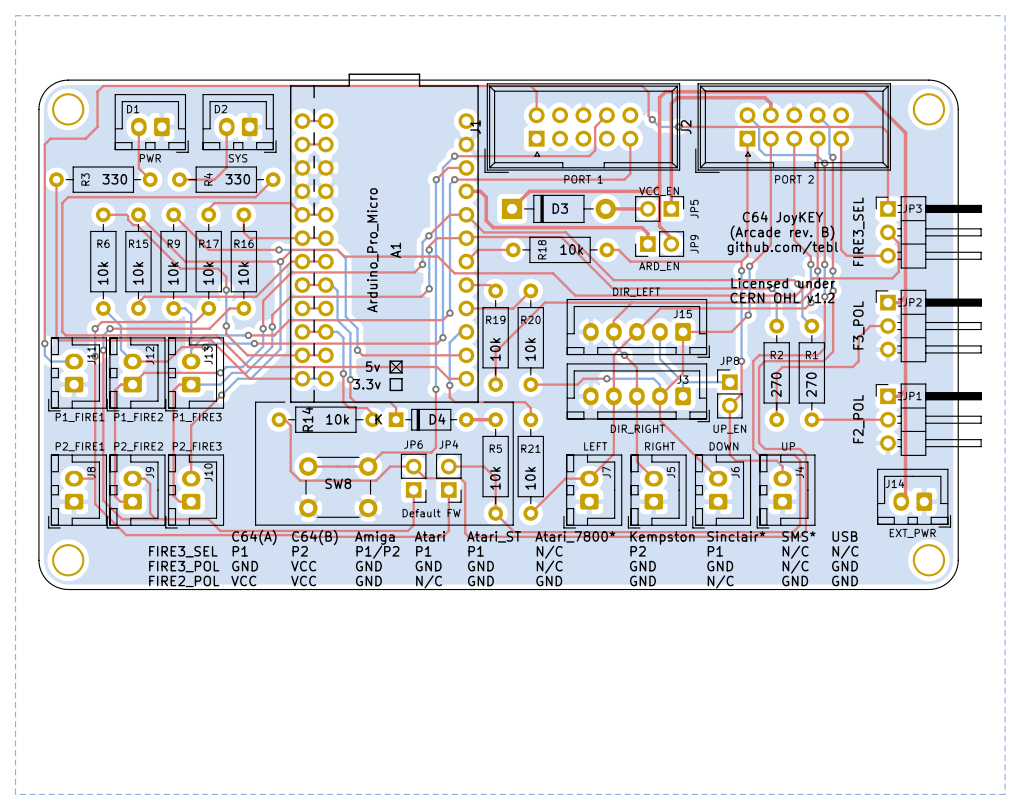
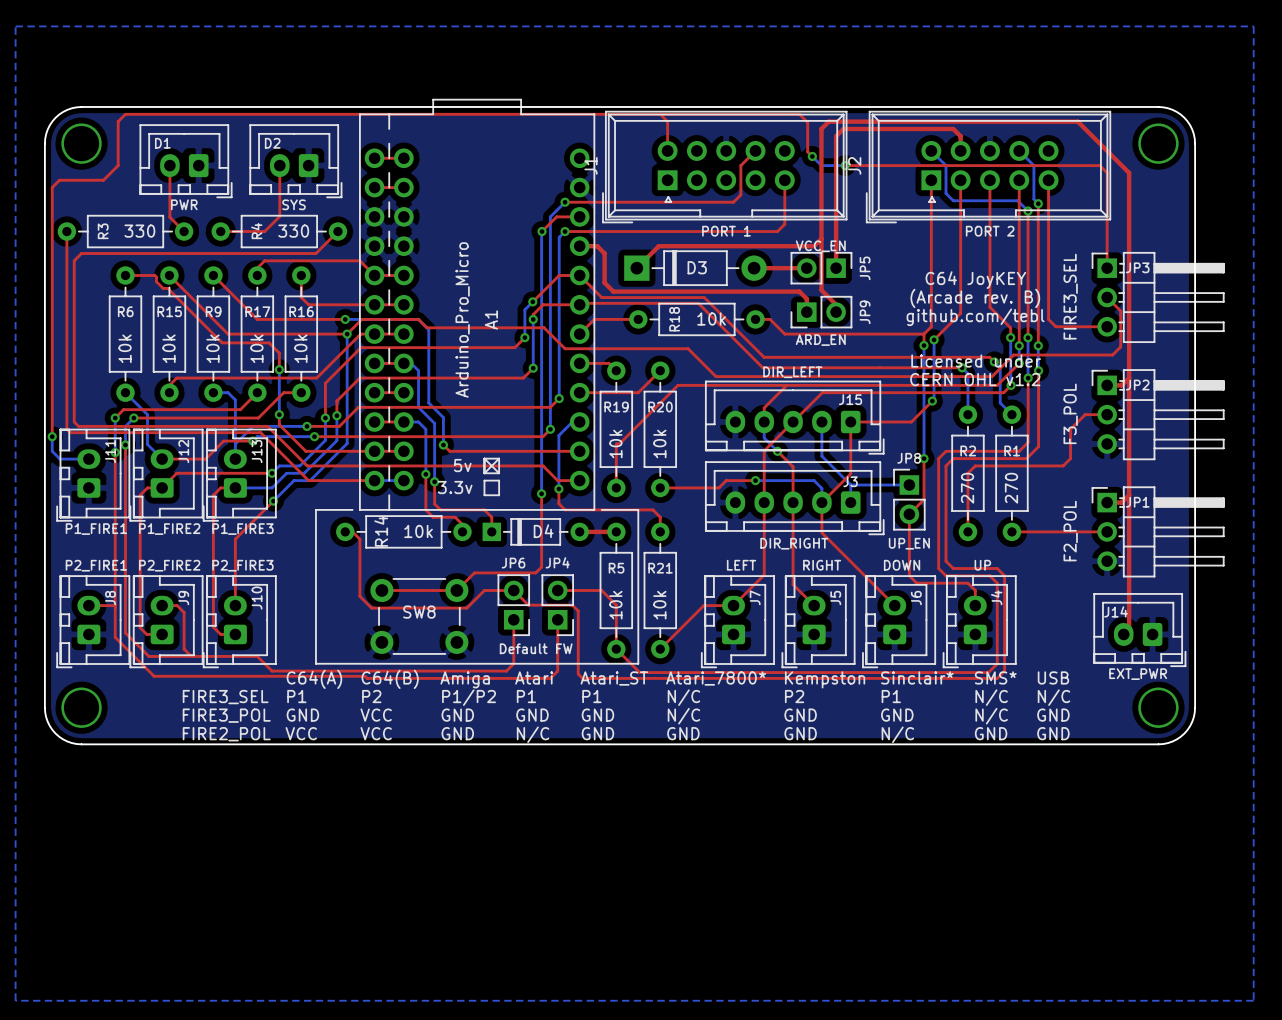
D4 text: K (378, 419) -> none

